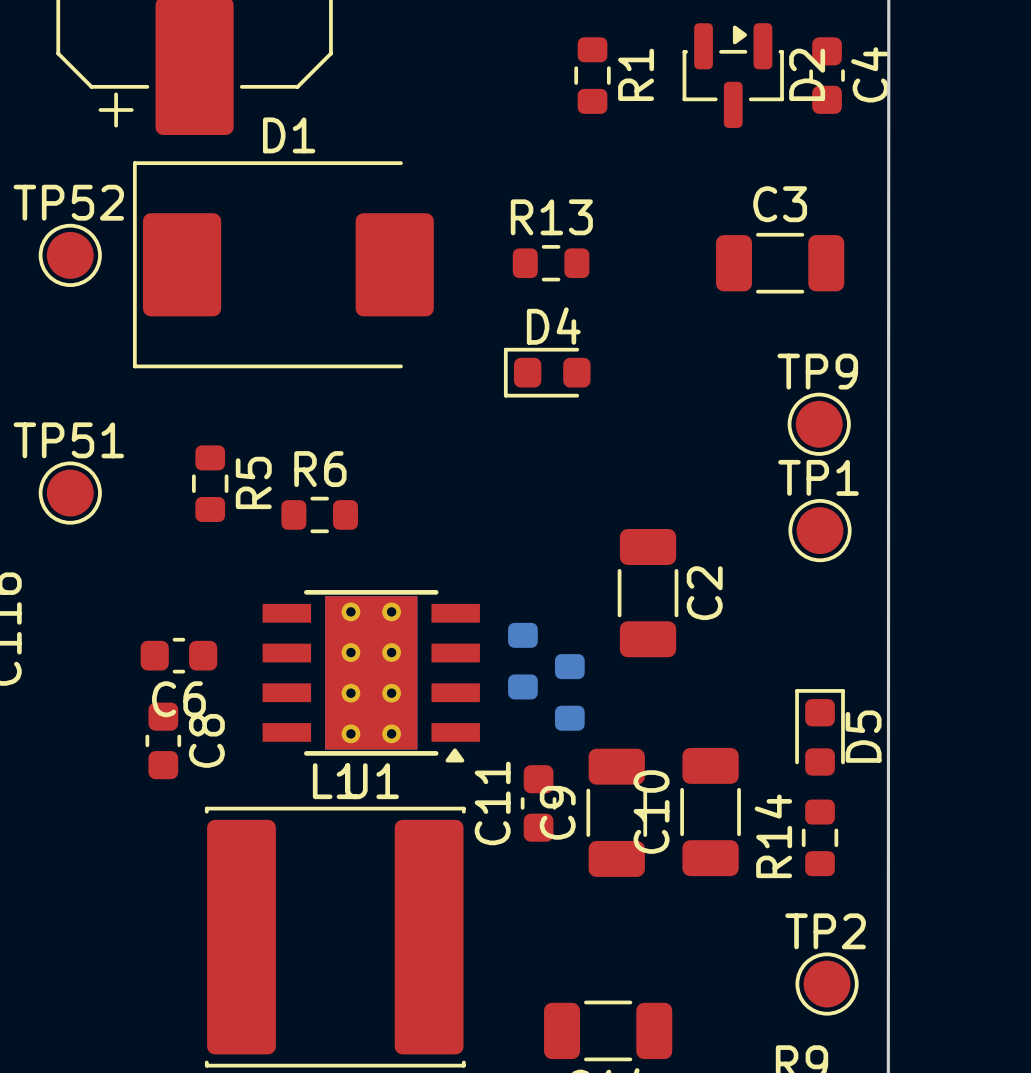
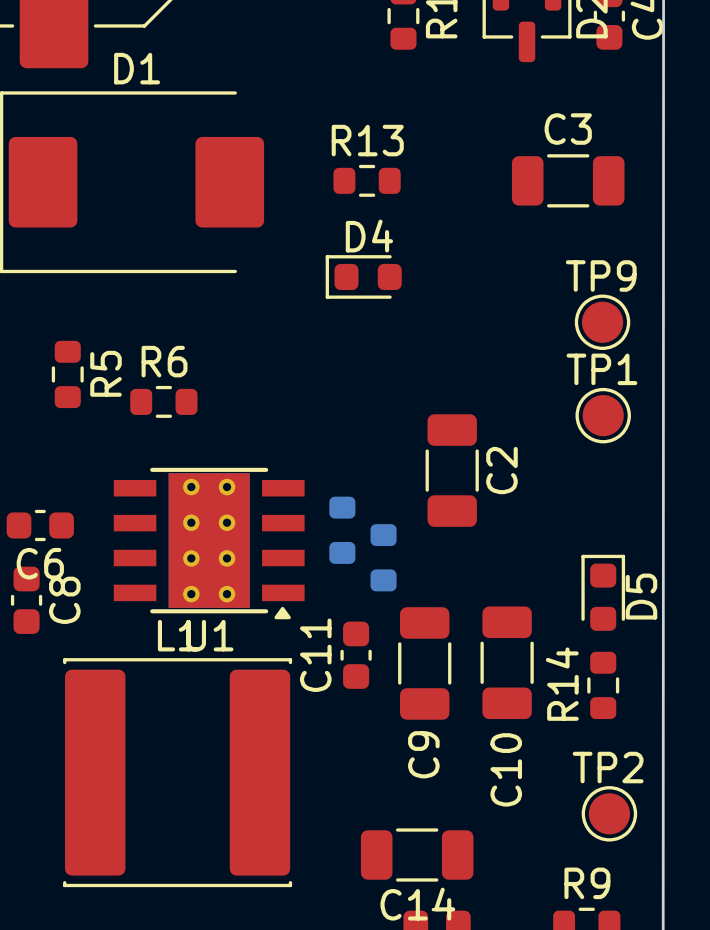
C9 name position: C9 (557, 812) -> C9 (423, 754)
C10 name position: C10 (651, 812) -> C10 (506, 769)

